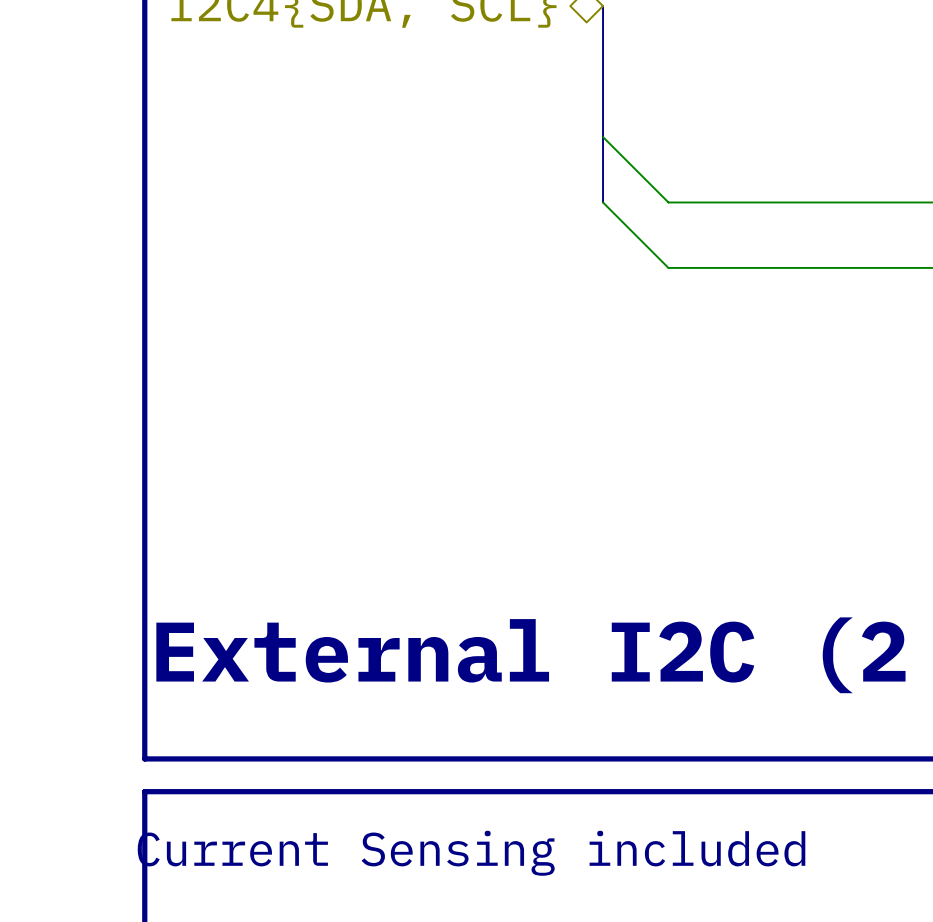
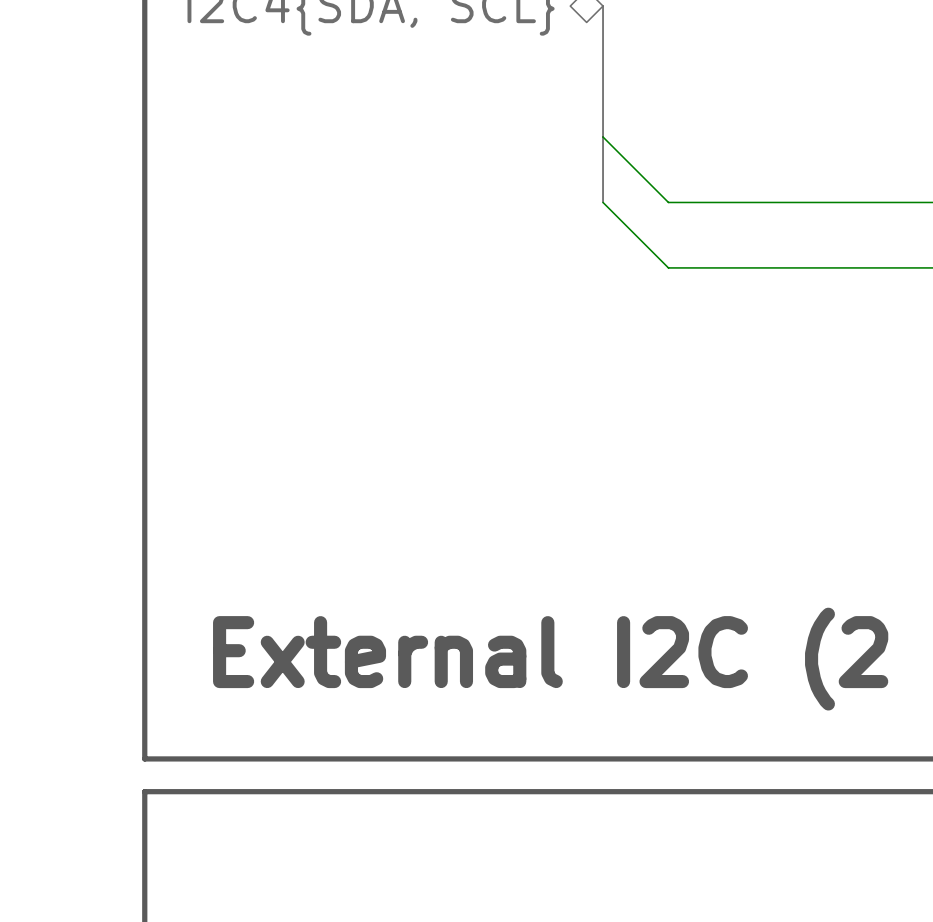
text: Current Sensing included (471, 853) -> none

